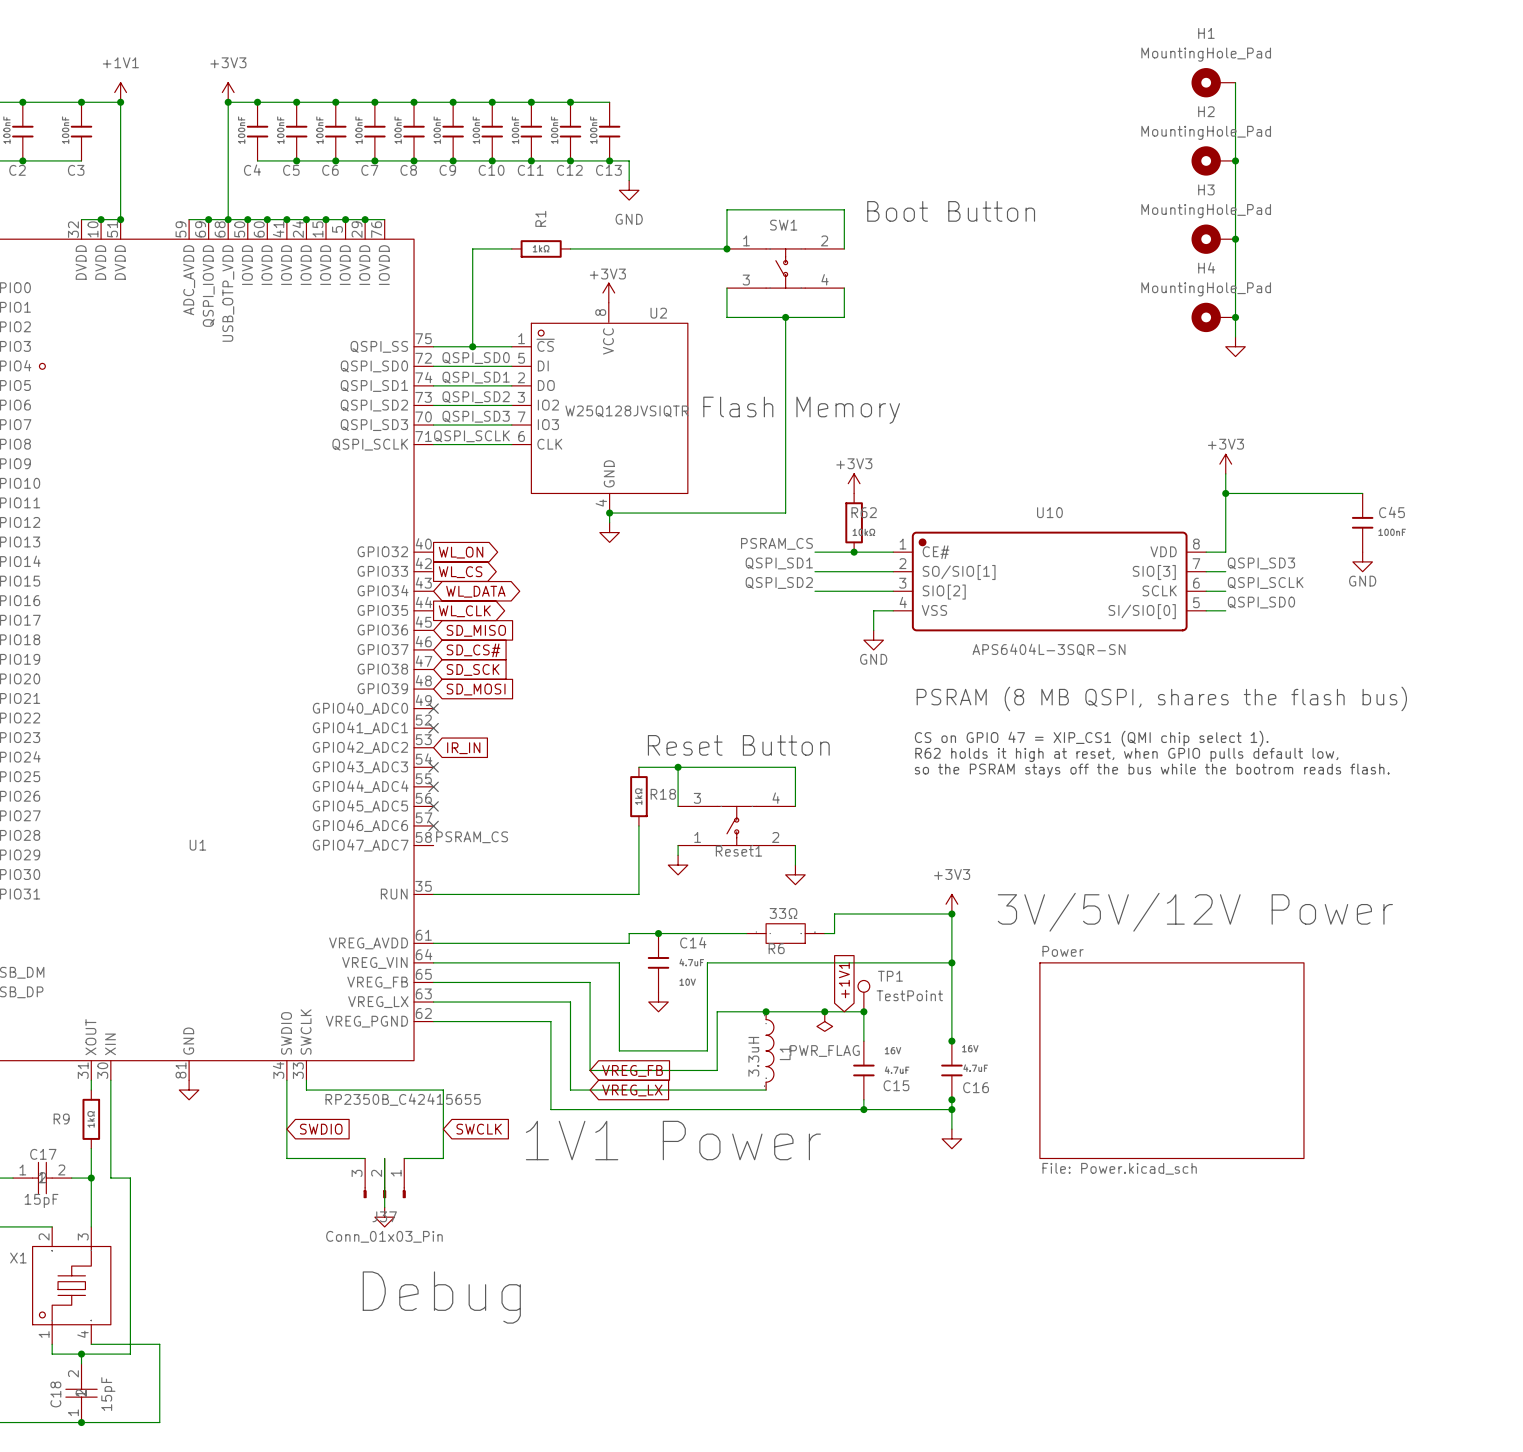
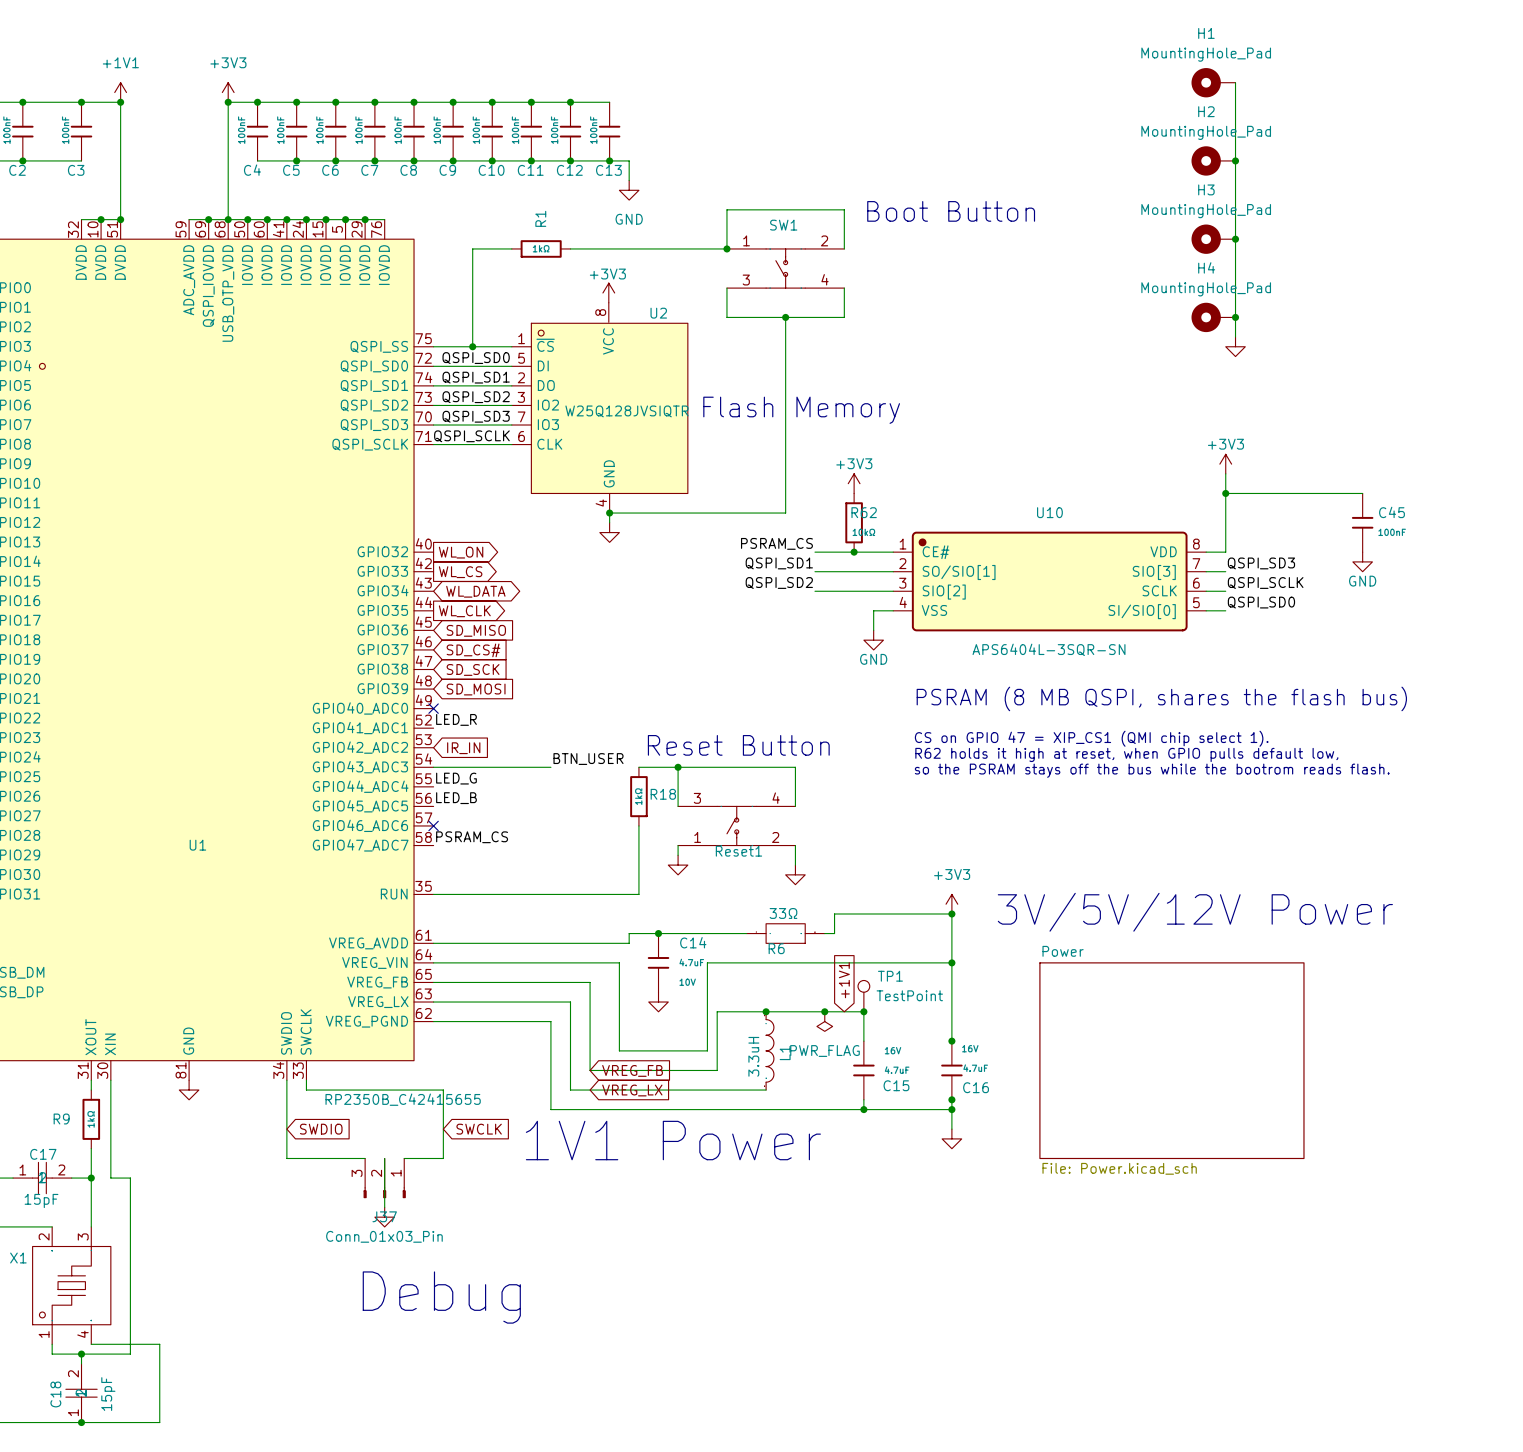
label: none -> LED_R (456, 719)
no-connect mark: (433, 728) -> none
label: none -> BTN_USER (588, 759)
wire: none -> (433, 767) (550, 767)
no-connect mark: (433, 767) -> none
label: none -> LED_G (456, 778)
no-connect mark: (433, 786) -> none
label: none -> LED_B (456, 798)
no-connect mark: (433, 806) -> none

